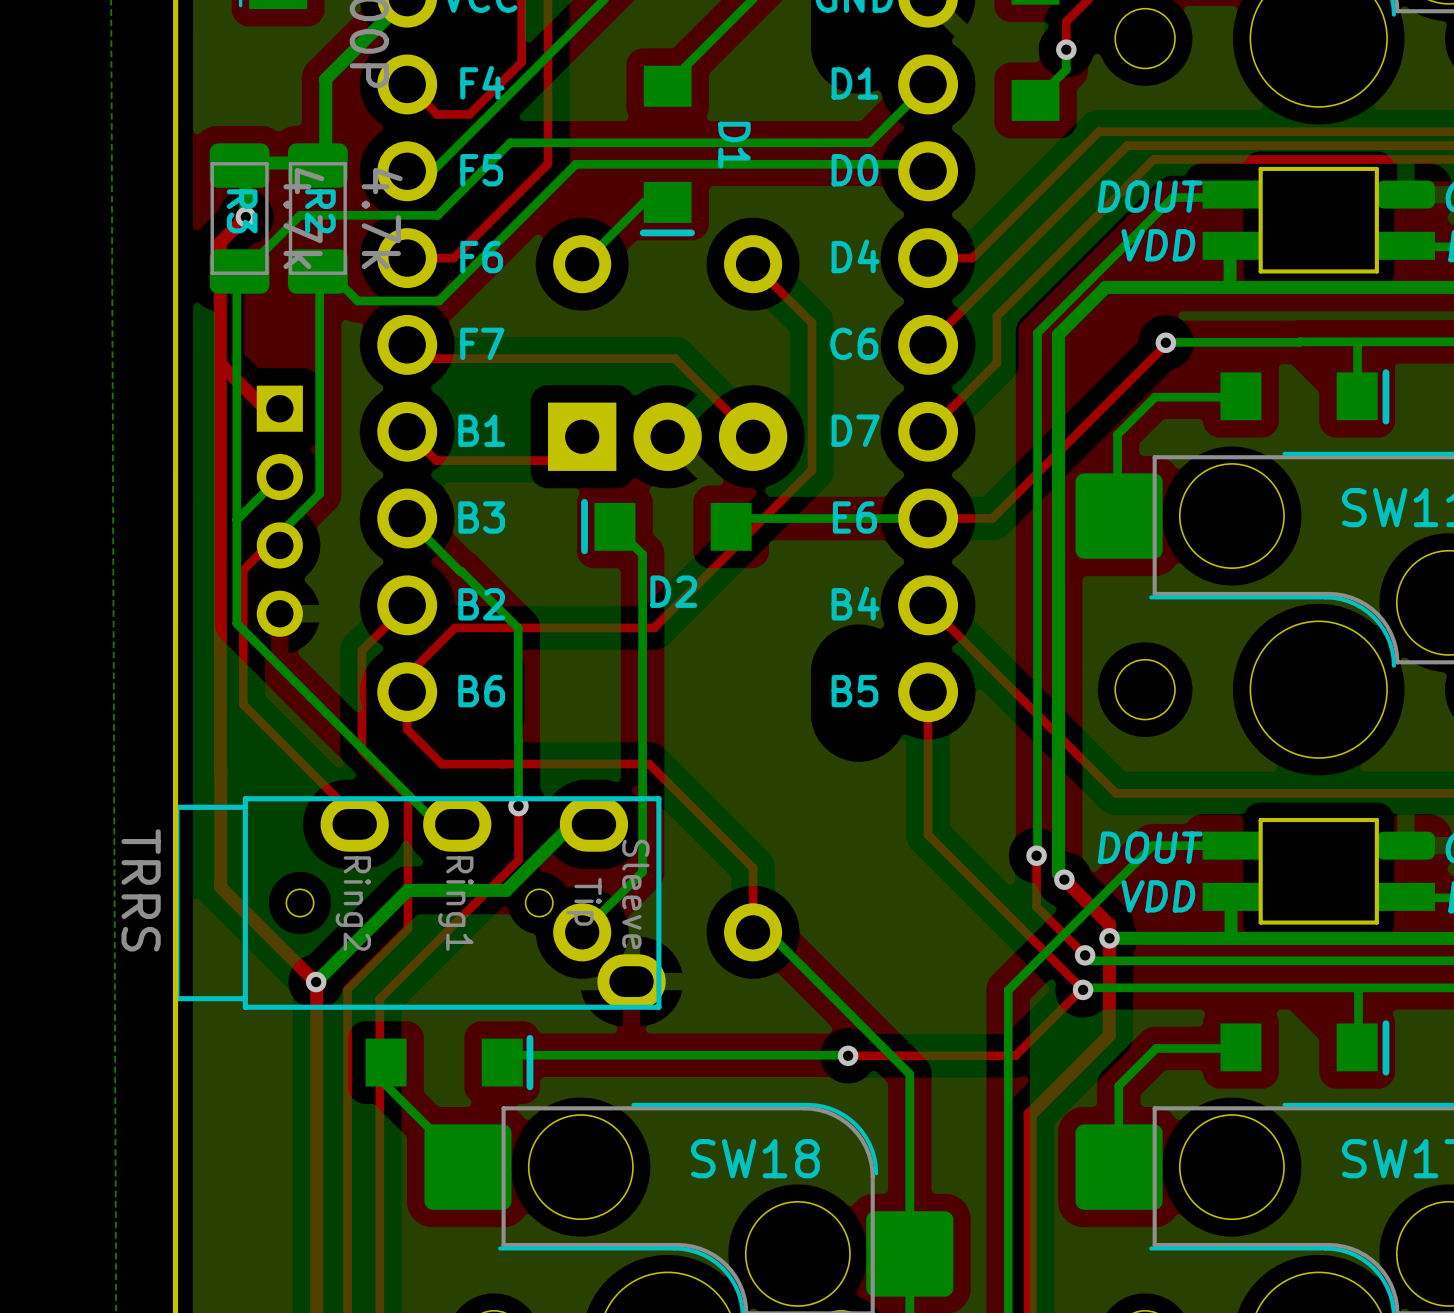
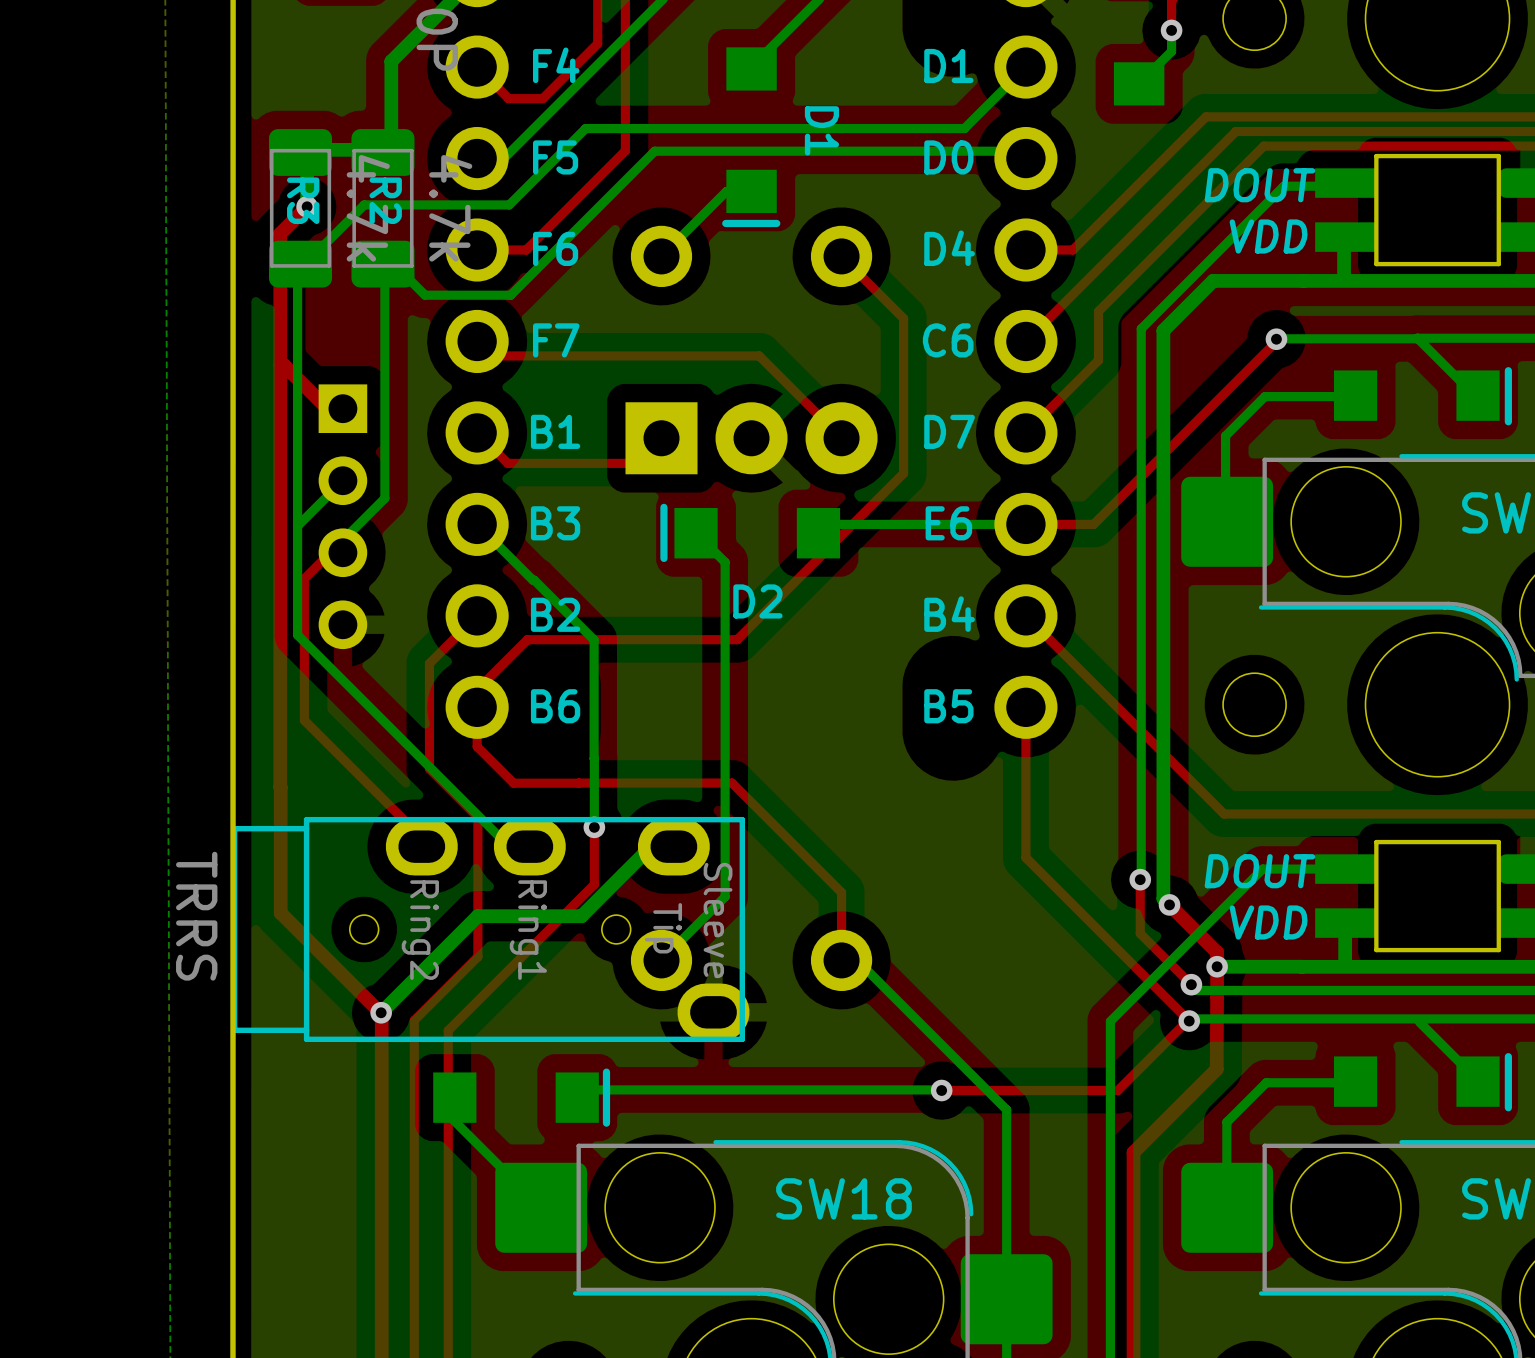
bottom track: none -> (1417, 338) (1476, 397)
bottom track: (1357, 343) (1357, 398) -> none
bottom track: (1358, 989) (1358, 1043) -> none
bottom track: none -> (1419, 1022) (1478, 1081)

